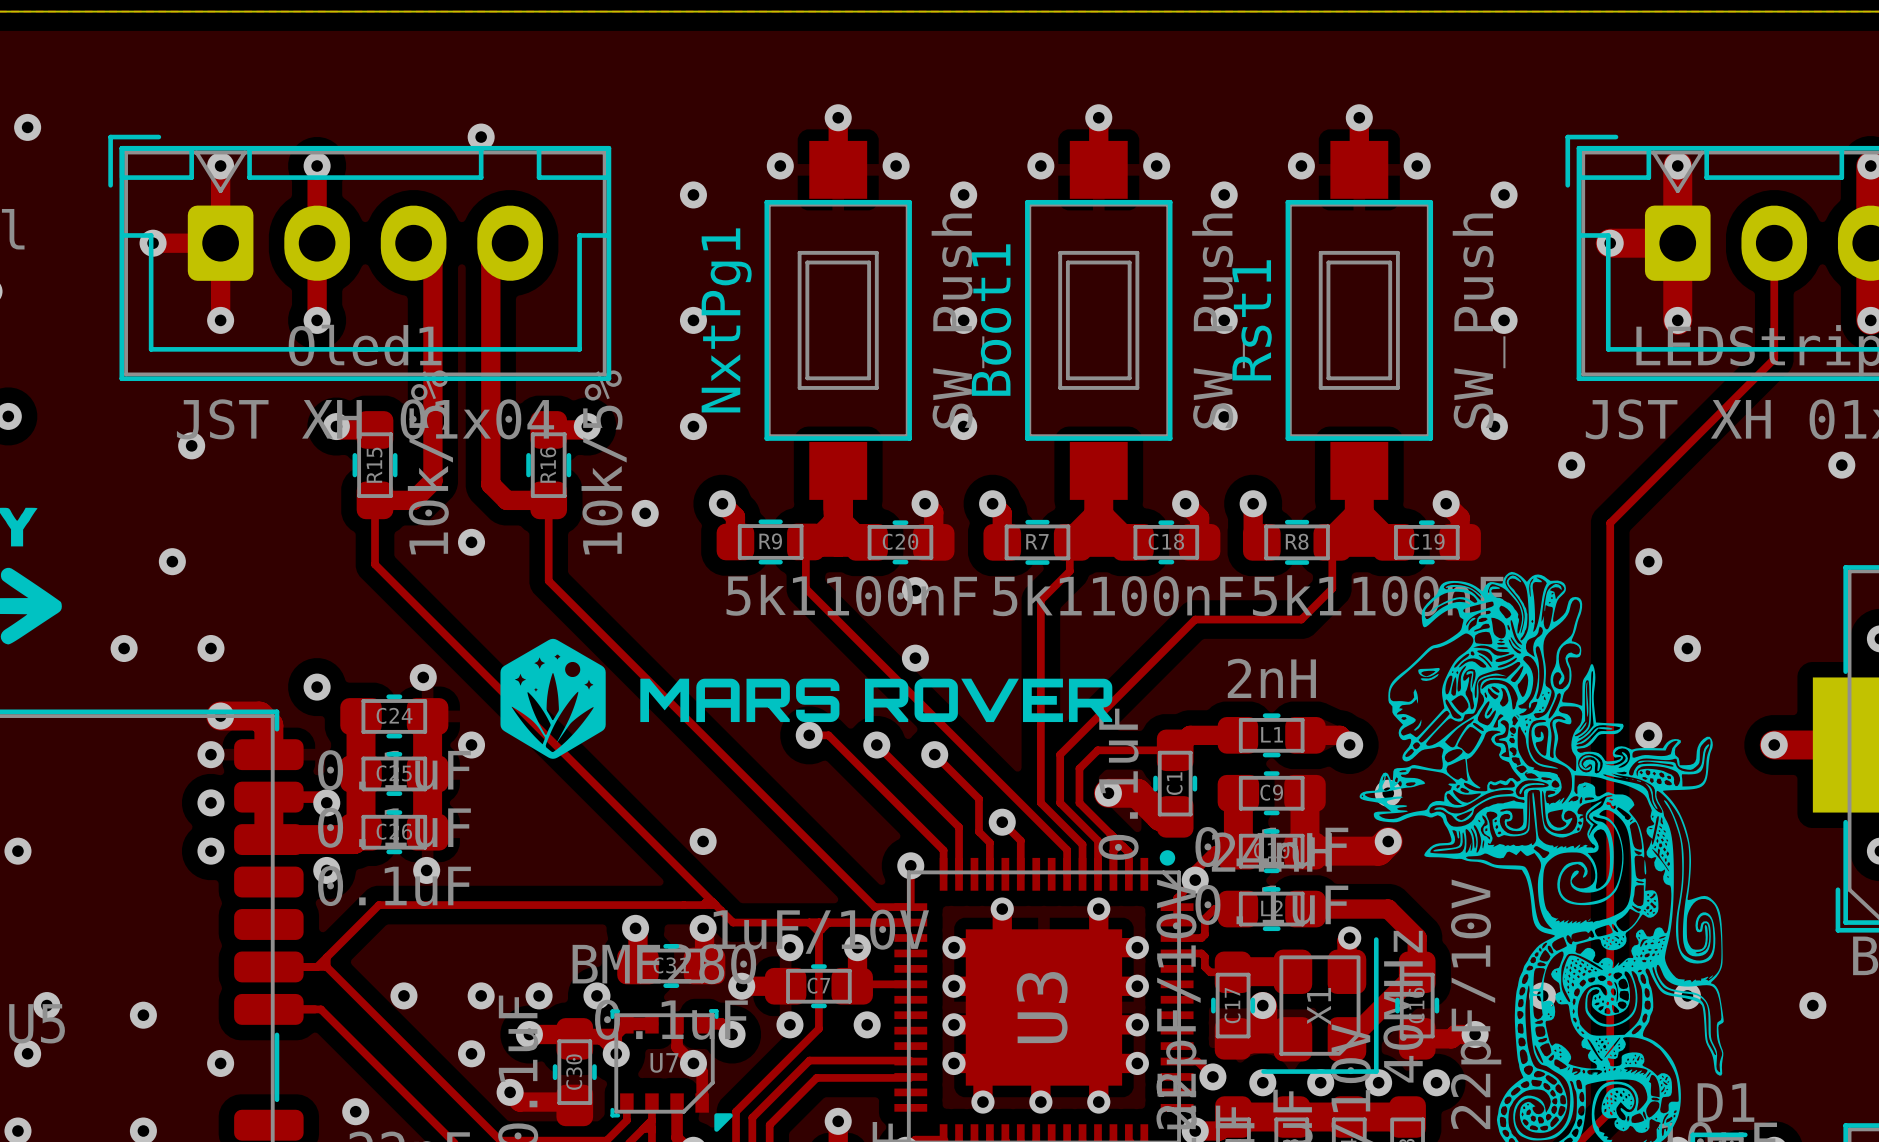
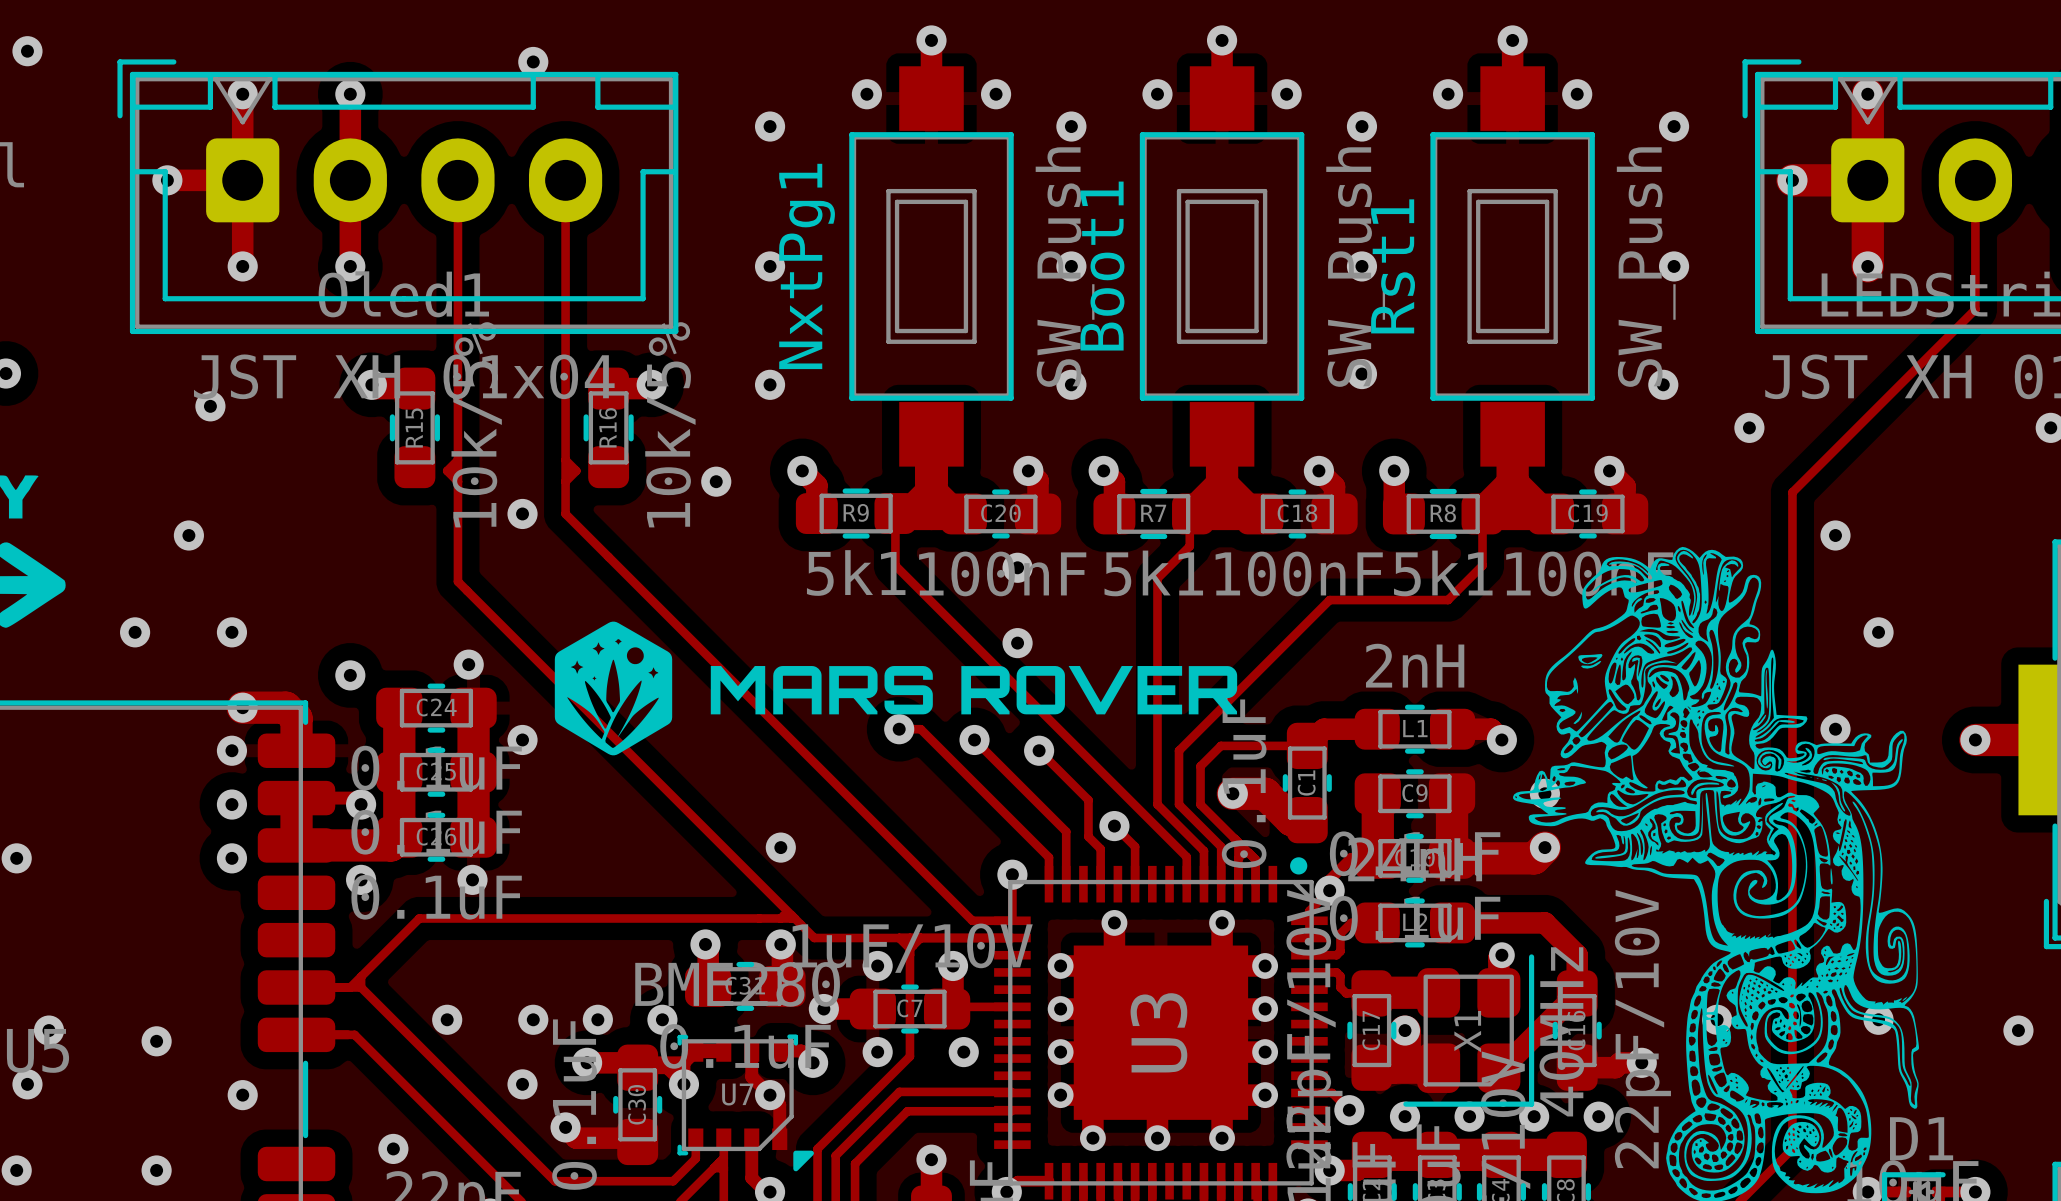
track: (413, 243) (432, 262) (432, 481) (413, 500) (375, 500) (375, 564) (413, 603) -> (457, 180) (457, 581)
track: (510, 243) (490, 262) (490, 484) (506, 500) (548, 500) (548, 580) -> (565, 180) (565, 513) (608, 557)
track: none -> (457, 460) (447, 470) (457, 481)
track: none -> (565, 460) (576, 470) (565, 481)

